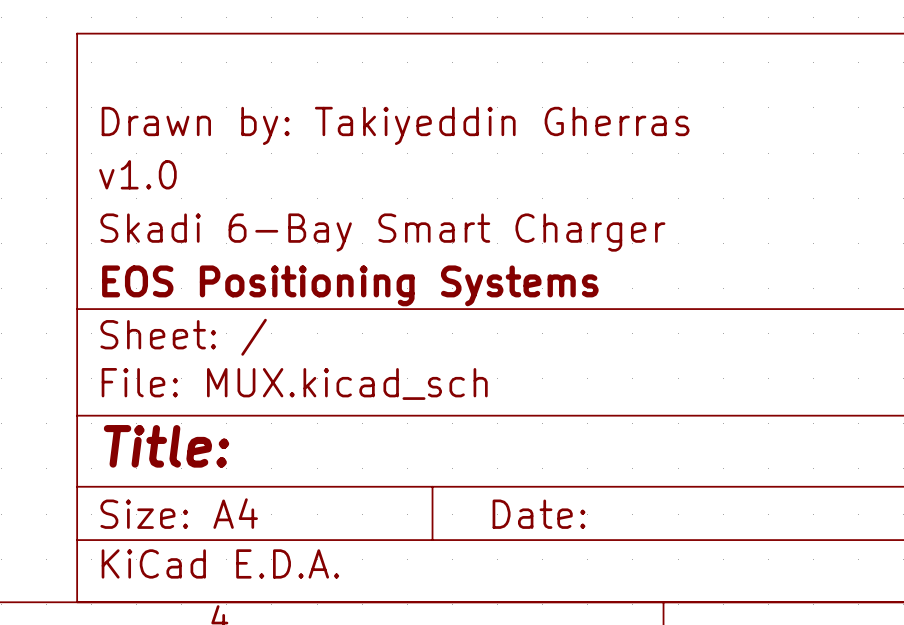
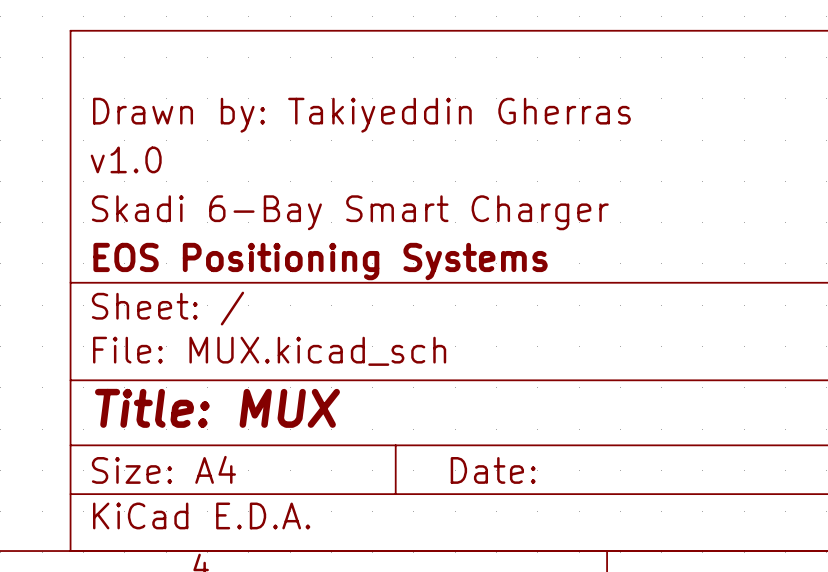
title block: Title: (166, 446) -> Title: MUX (217, 408)

